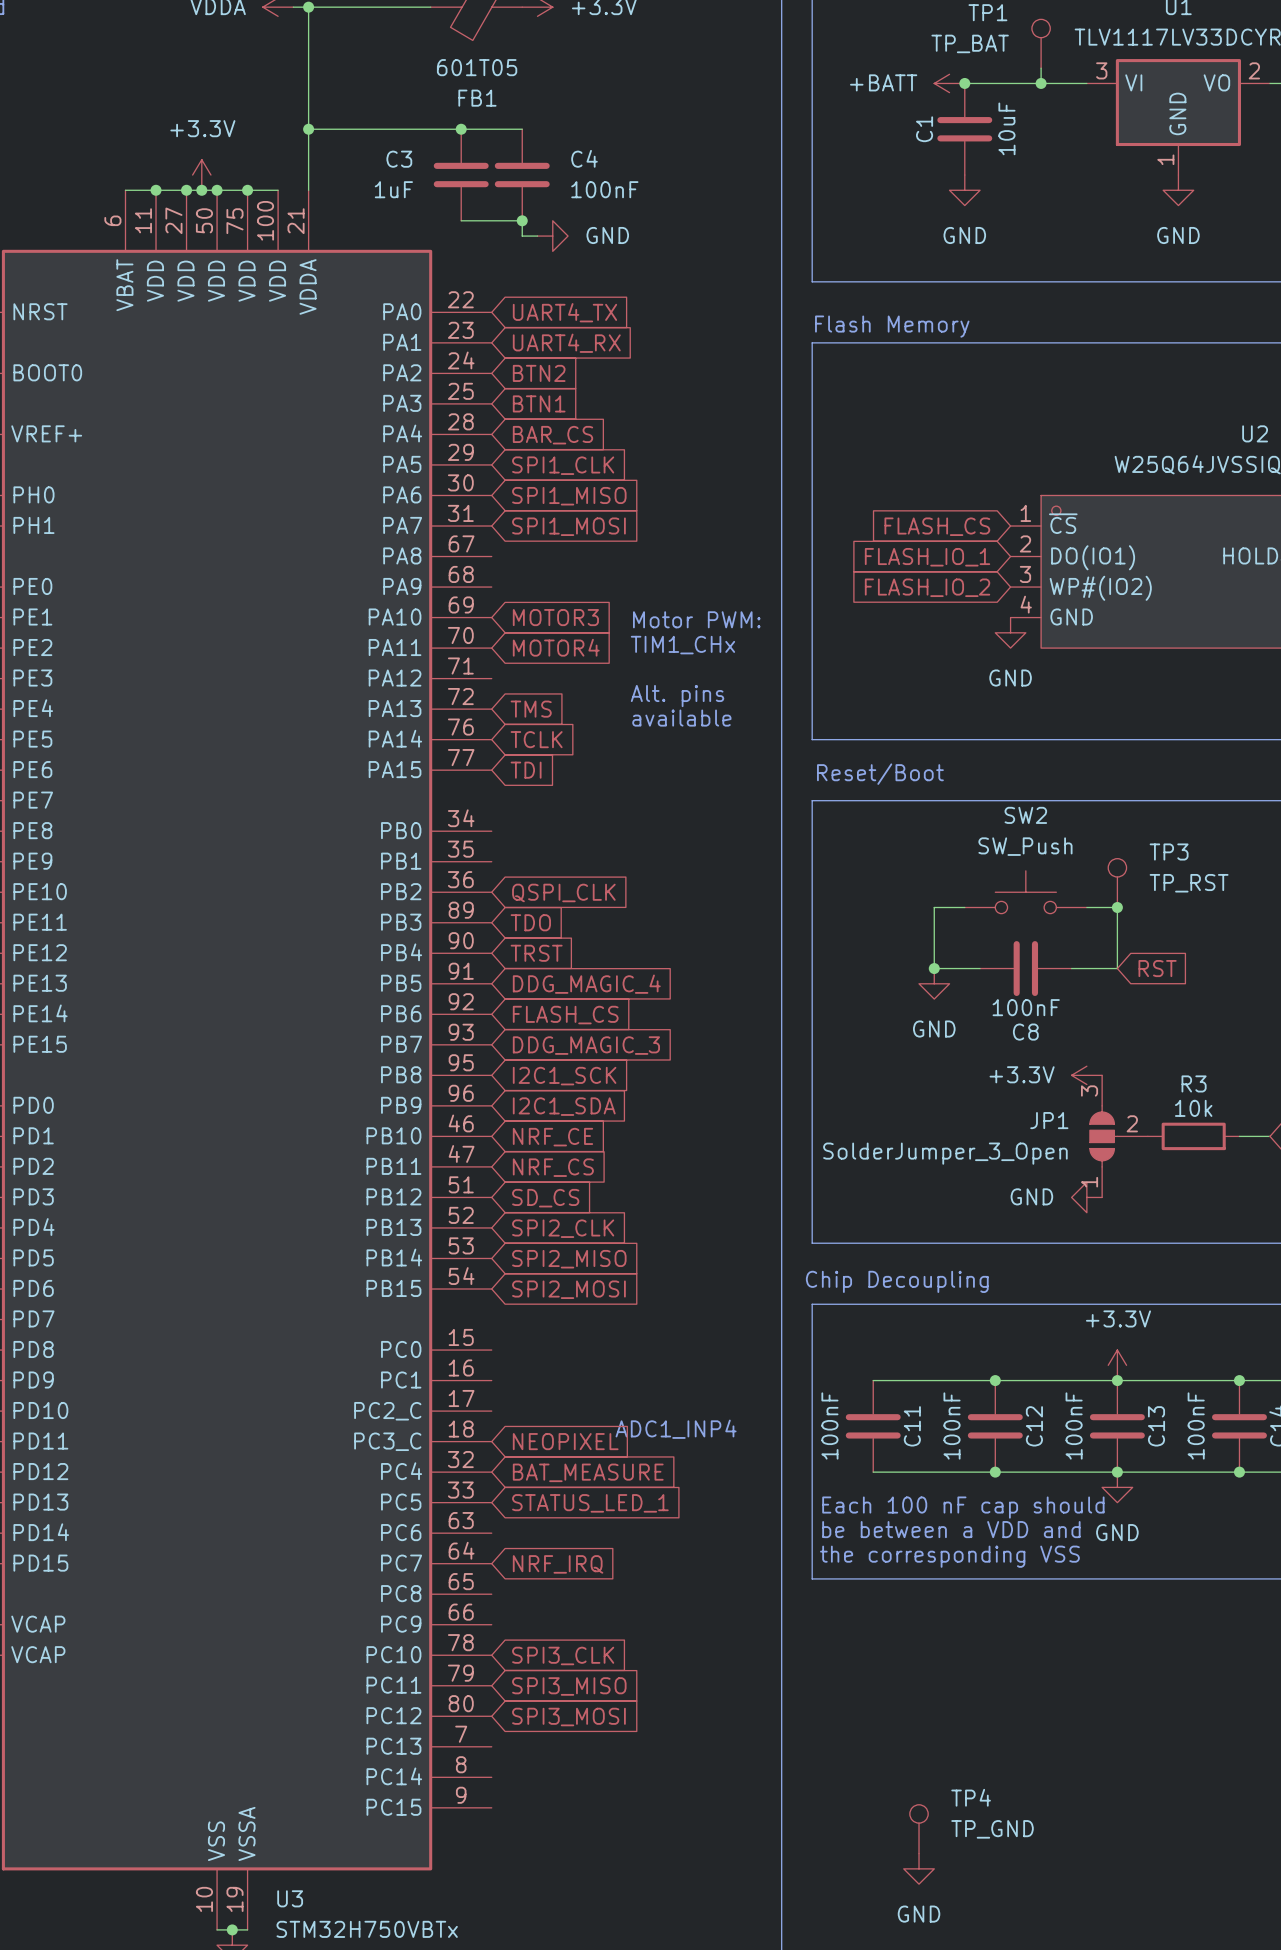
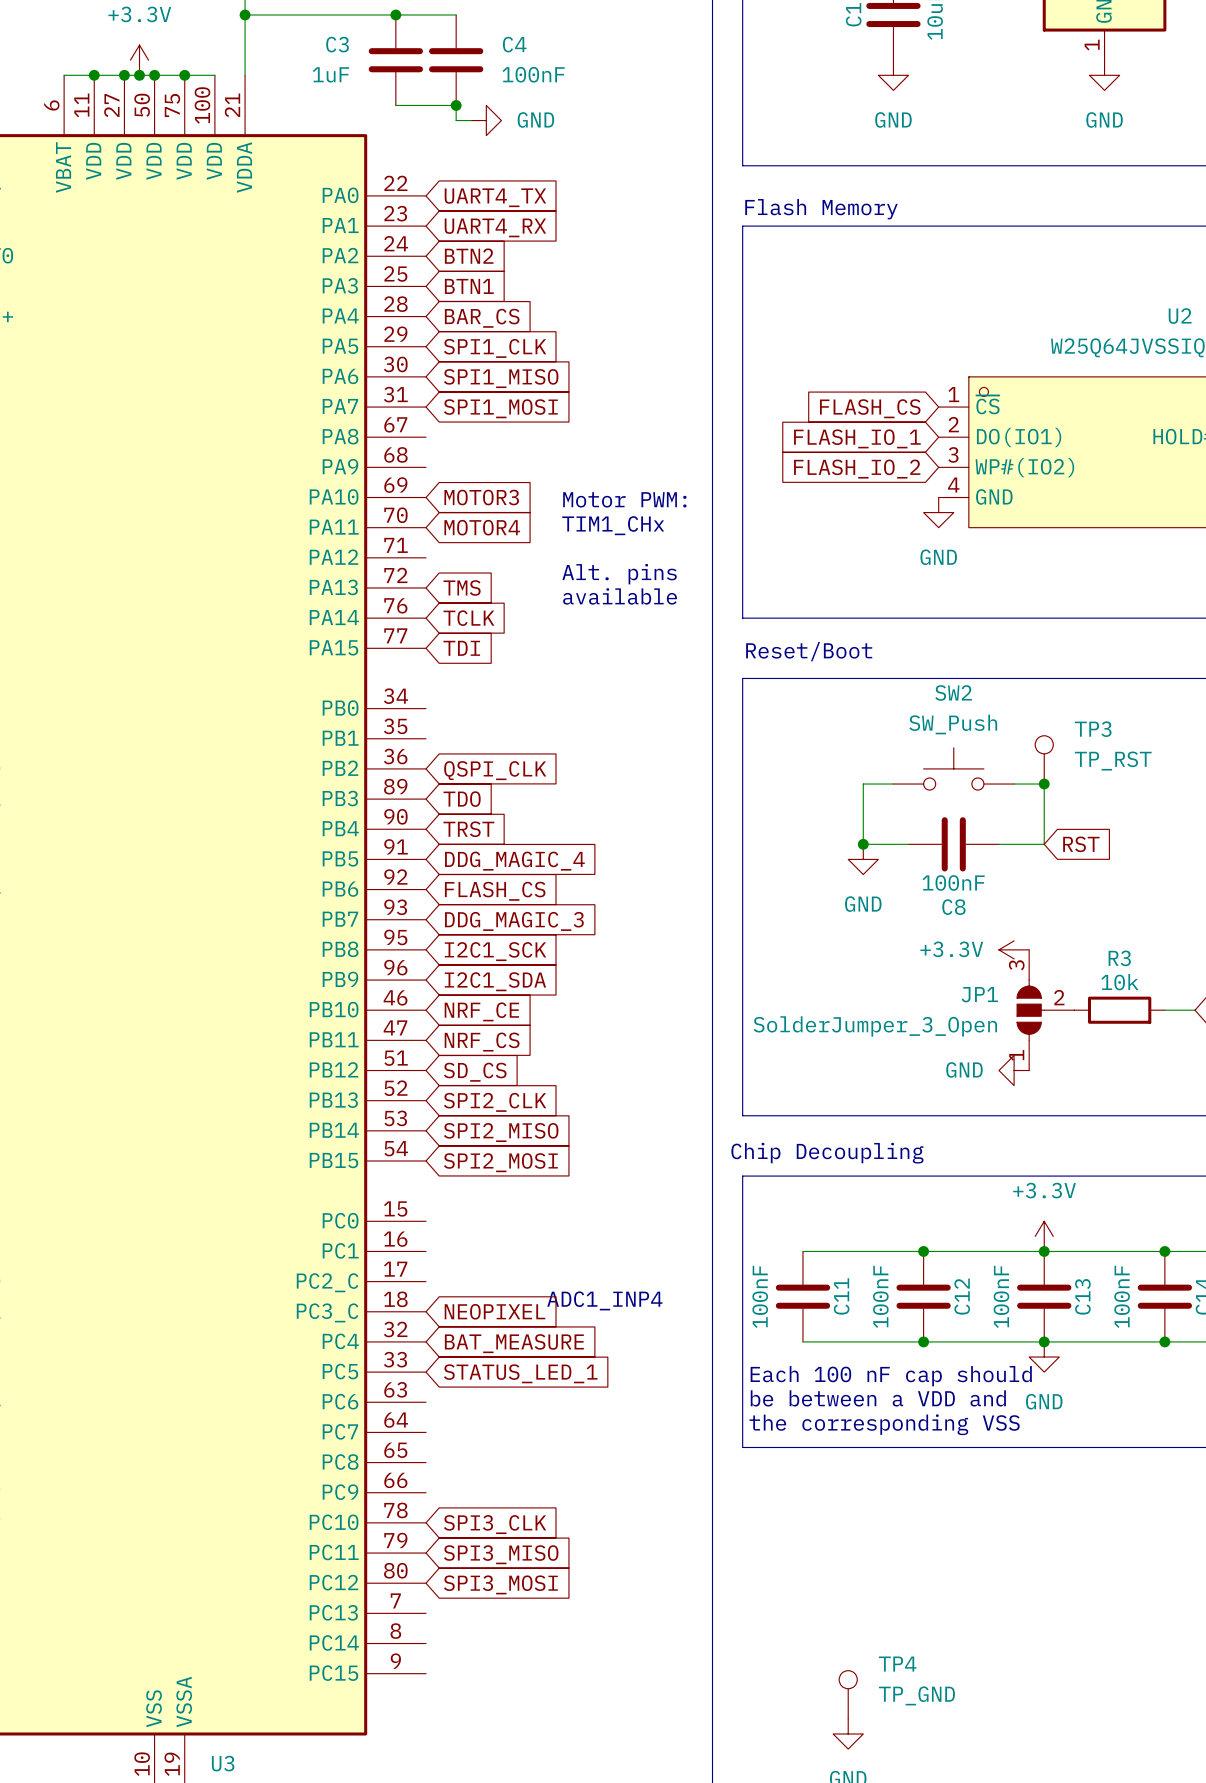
global label: NRF_IRQ (558, 1564) -> none

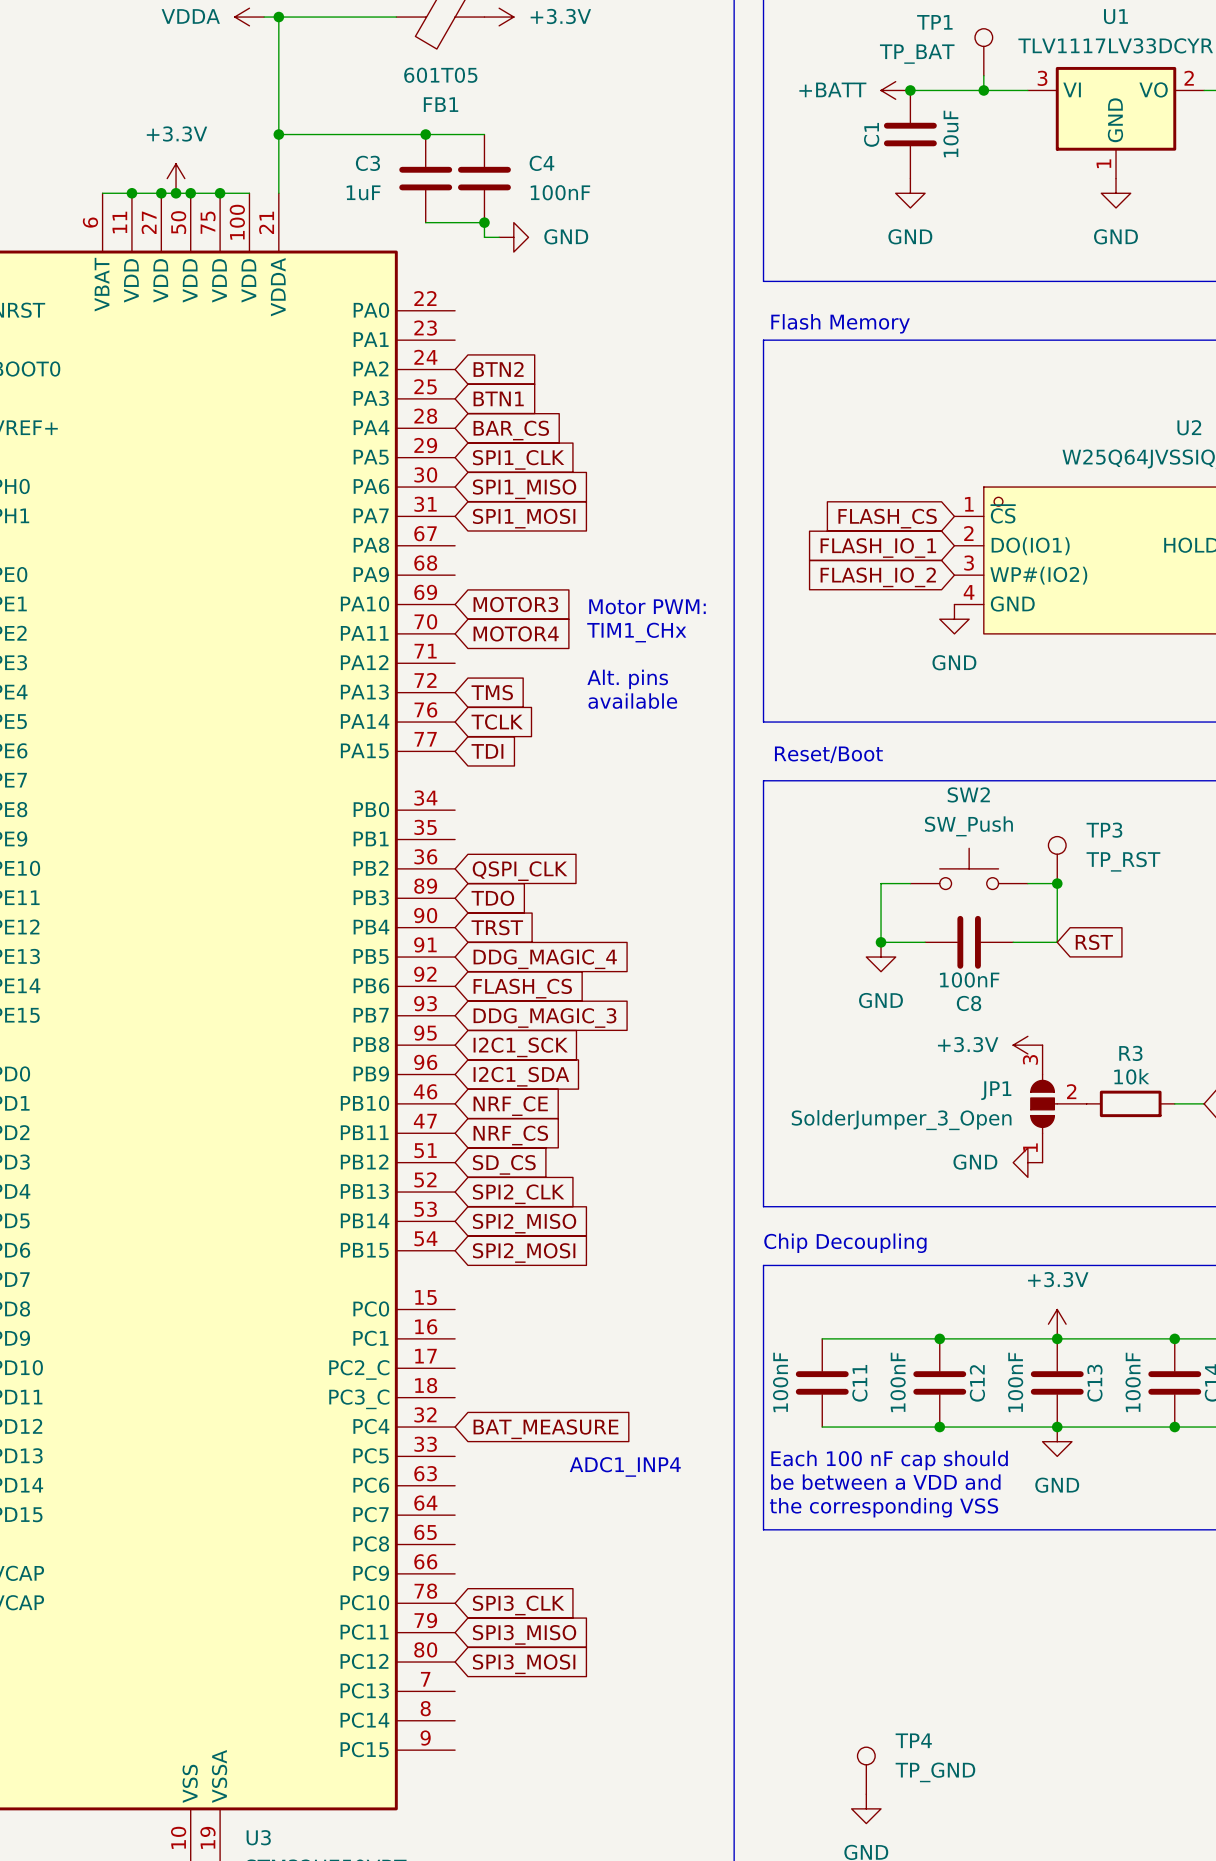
global label: UART4_TX (495, 197) -> none
global label: UART4_RX (495, 227) -> none
text position: ADC1_INP4 (604, 1300) -> ADC1_INP4 (625, 1466)
global label: NEOPIXEL (494, 1311) -> none
global label: STATUS_LED_1 (520, 1373) -> none

